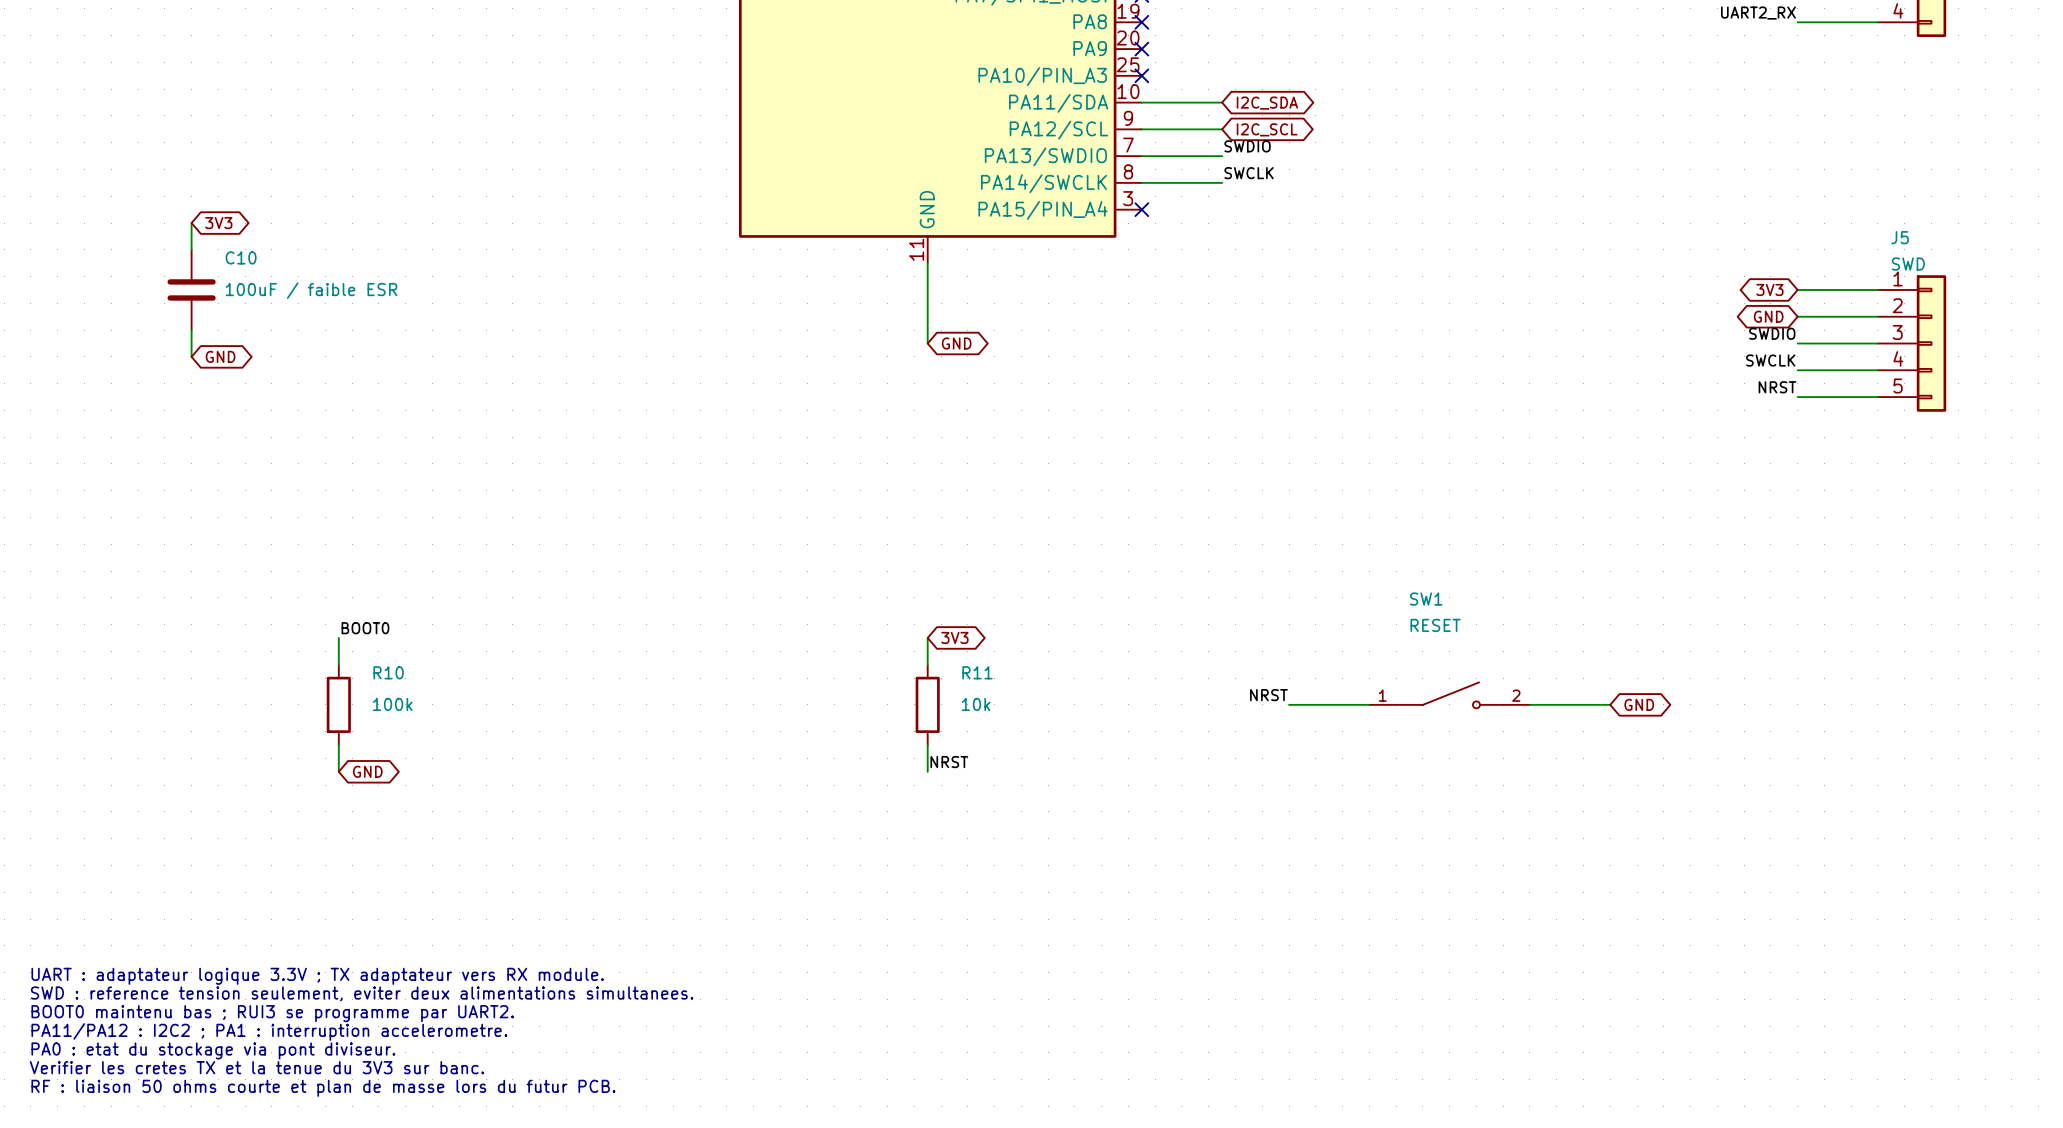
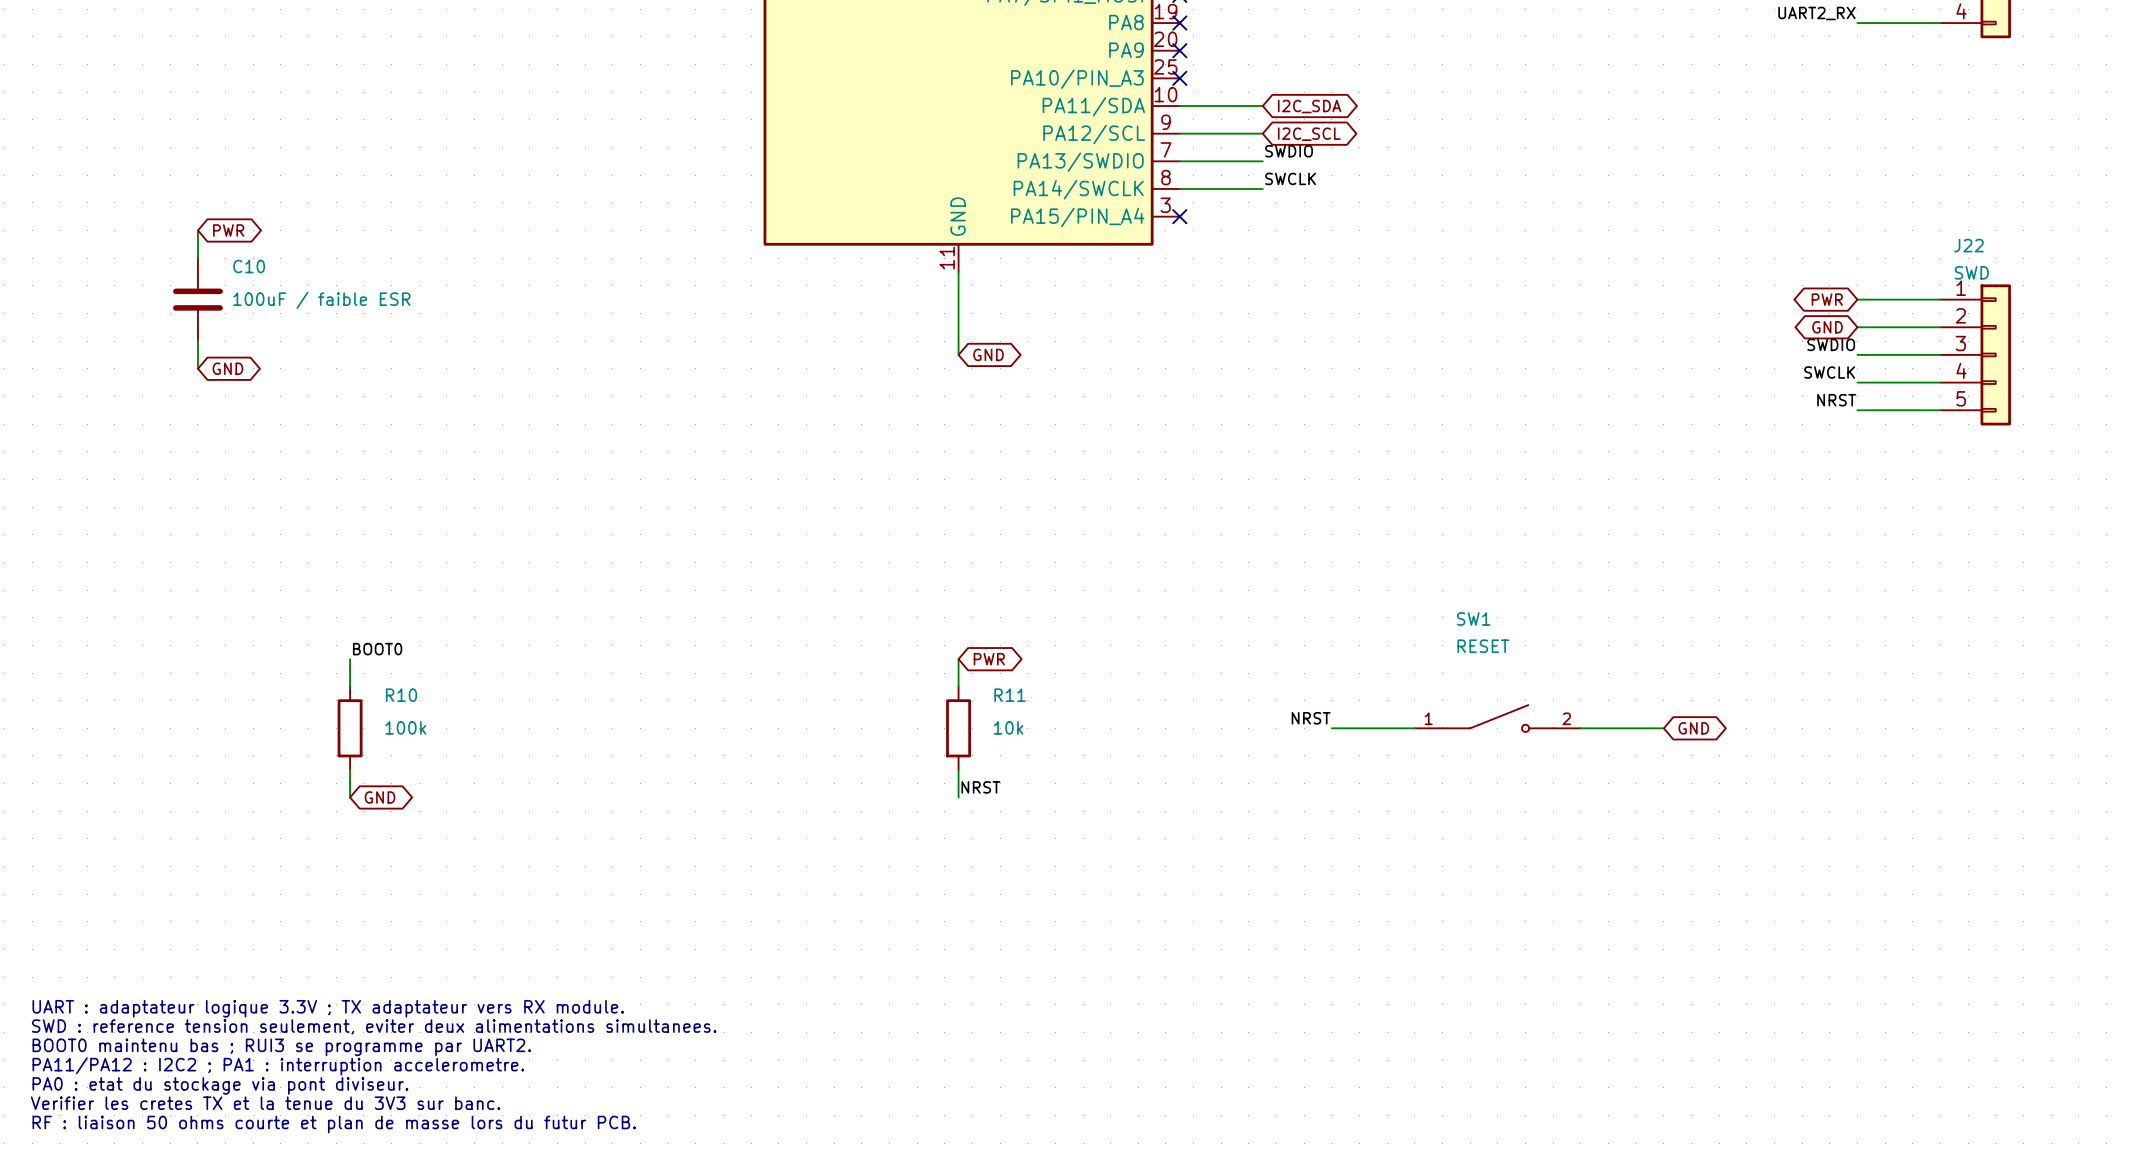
global label: 3V3 (218, 223) -> PWR (228, 230)
J5 name: J5 (1900, 237) -> J22 (1968, 245)
global label: 3V3 (1769, 289) -> PWR (1827, 299)
global label: 3V3 (954, 637) -> PWR (989, 659)

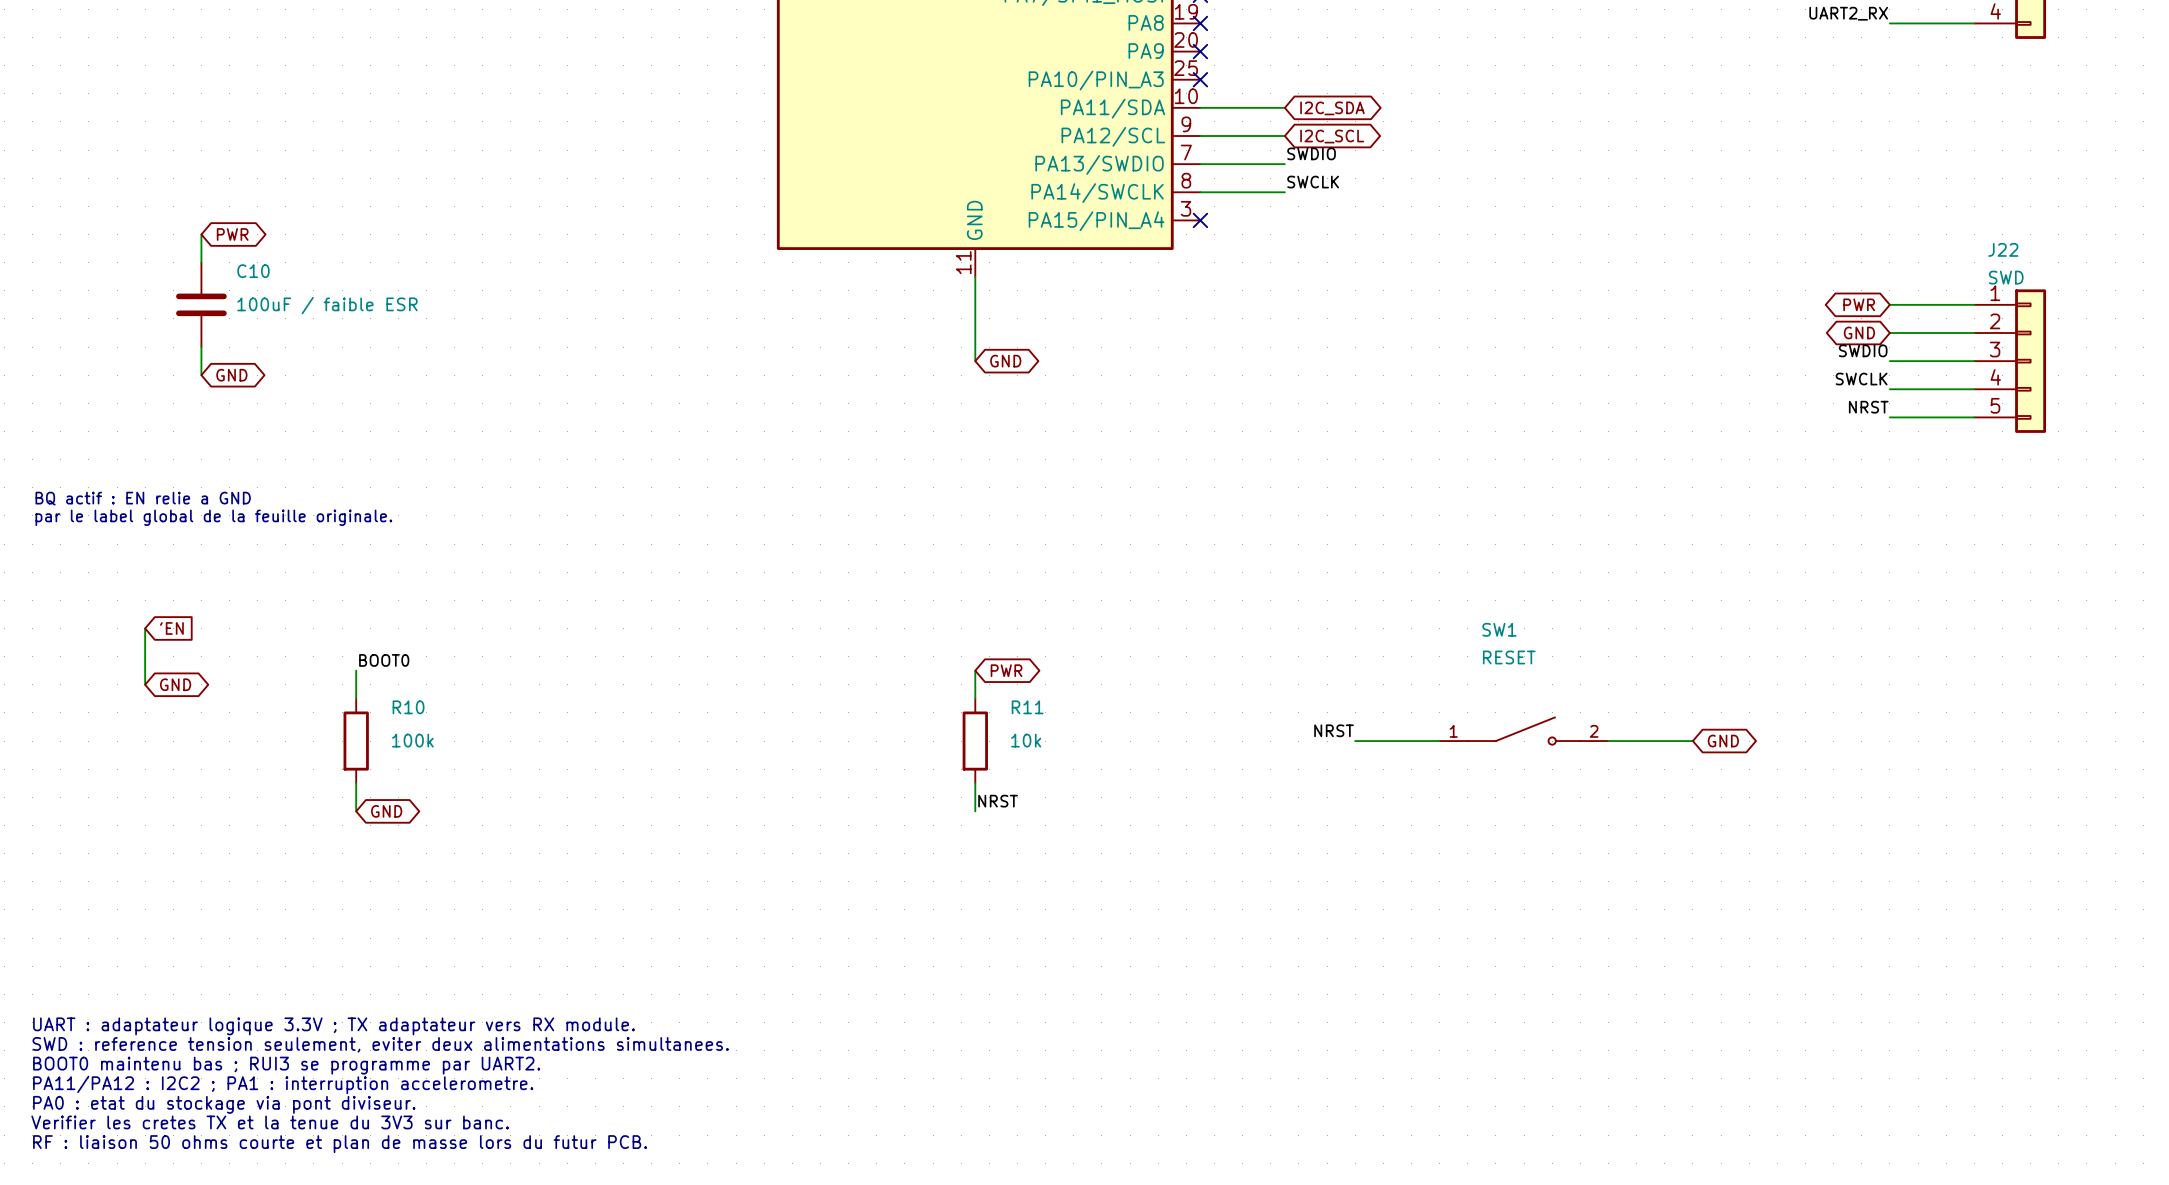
text: none -> BQ actif : EN relie a GND (143, 498)
text: none -> par le label global de la feuille originale. (213, 517)
wire: none -> (145, 628) (145, 684)
global label: none -> 'EN (171, 628)
global label: none -> GND (175, 684)

